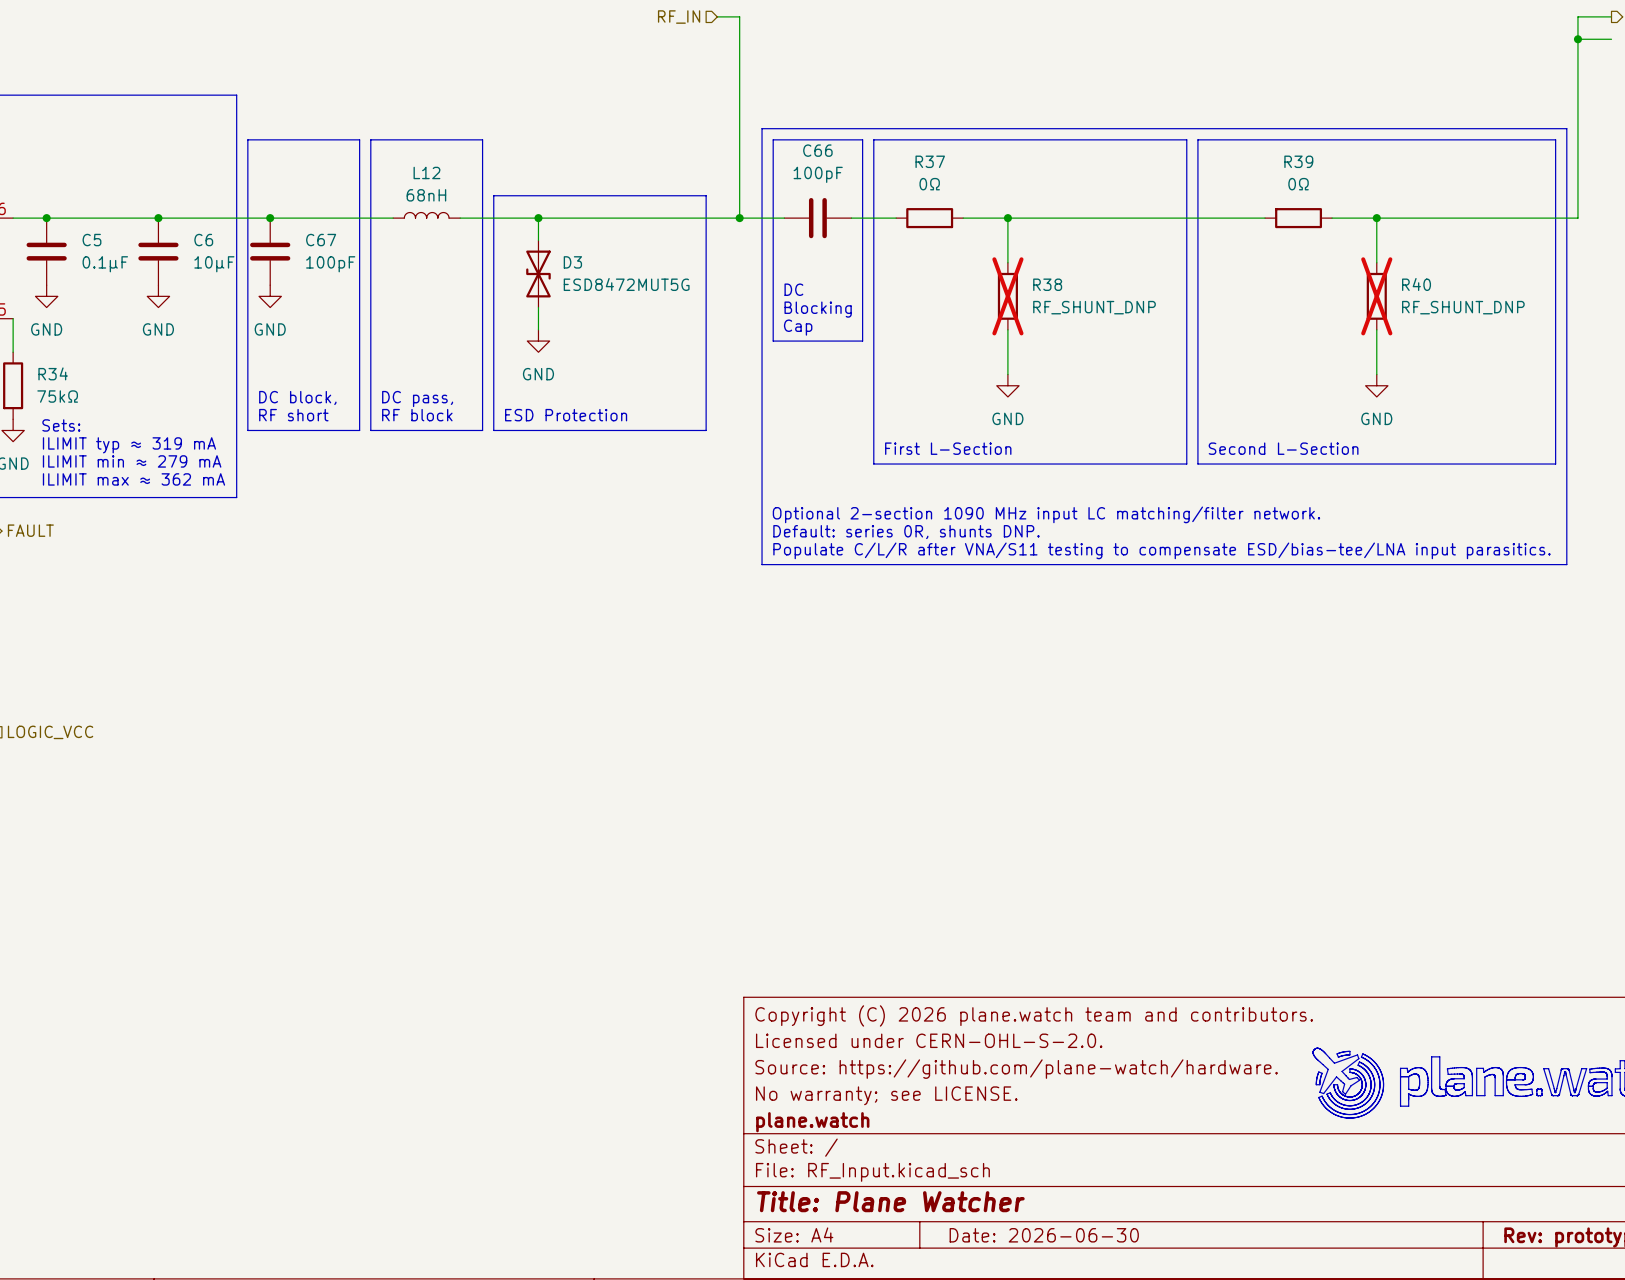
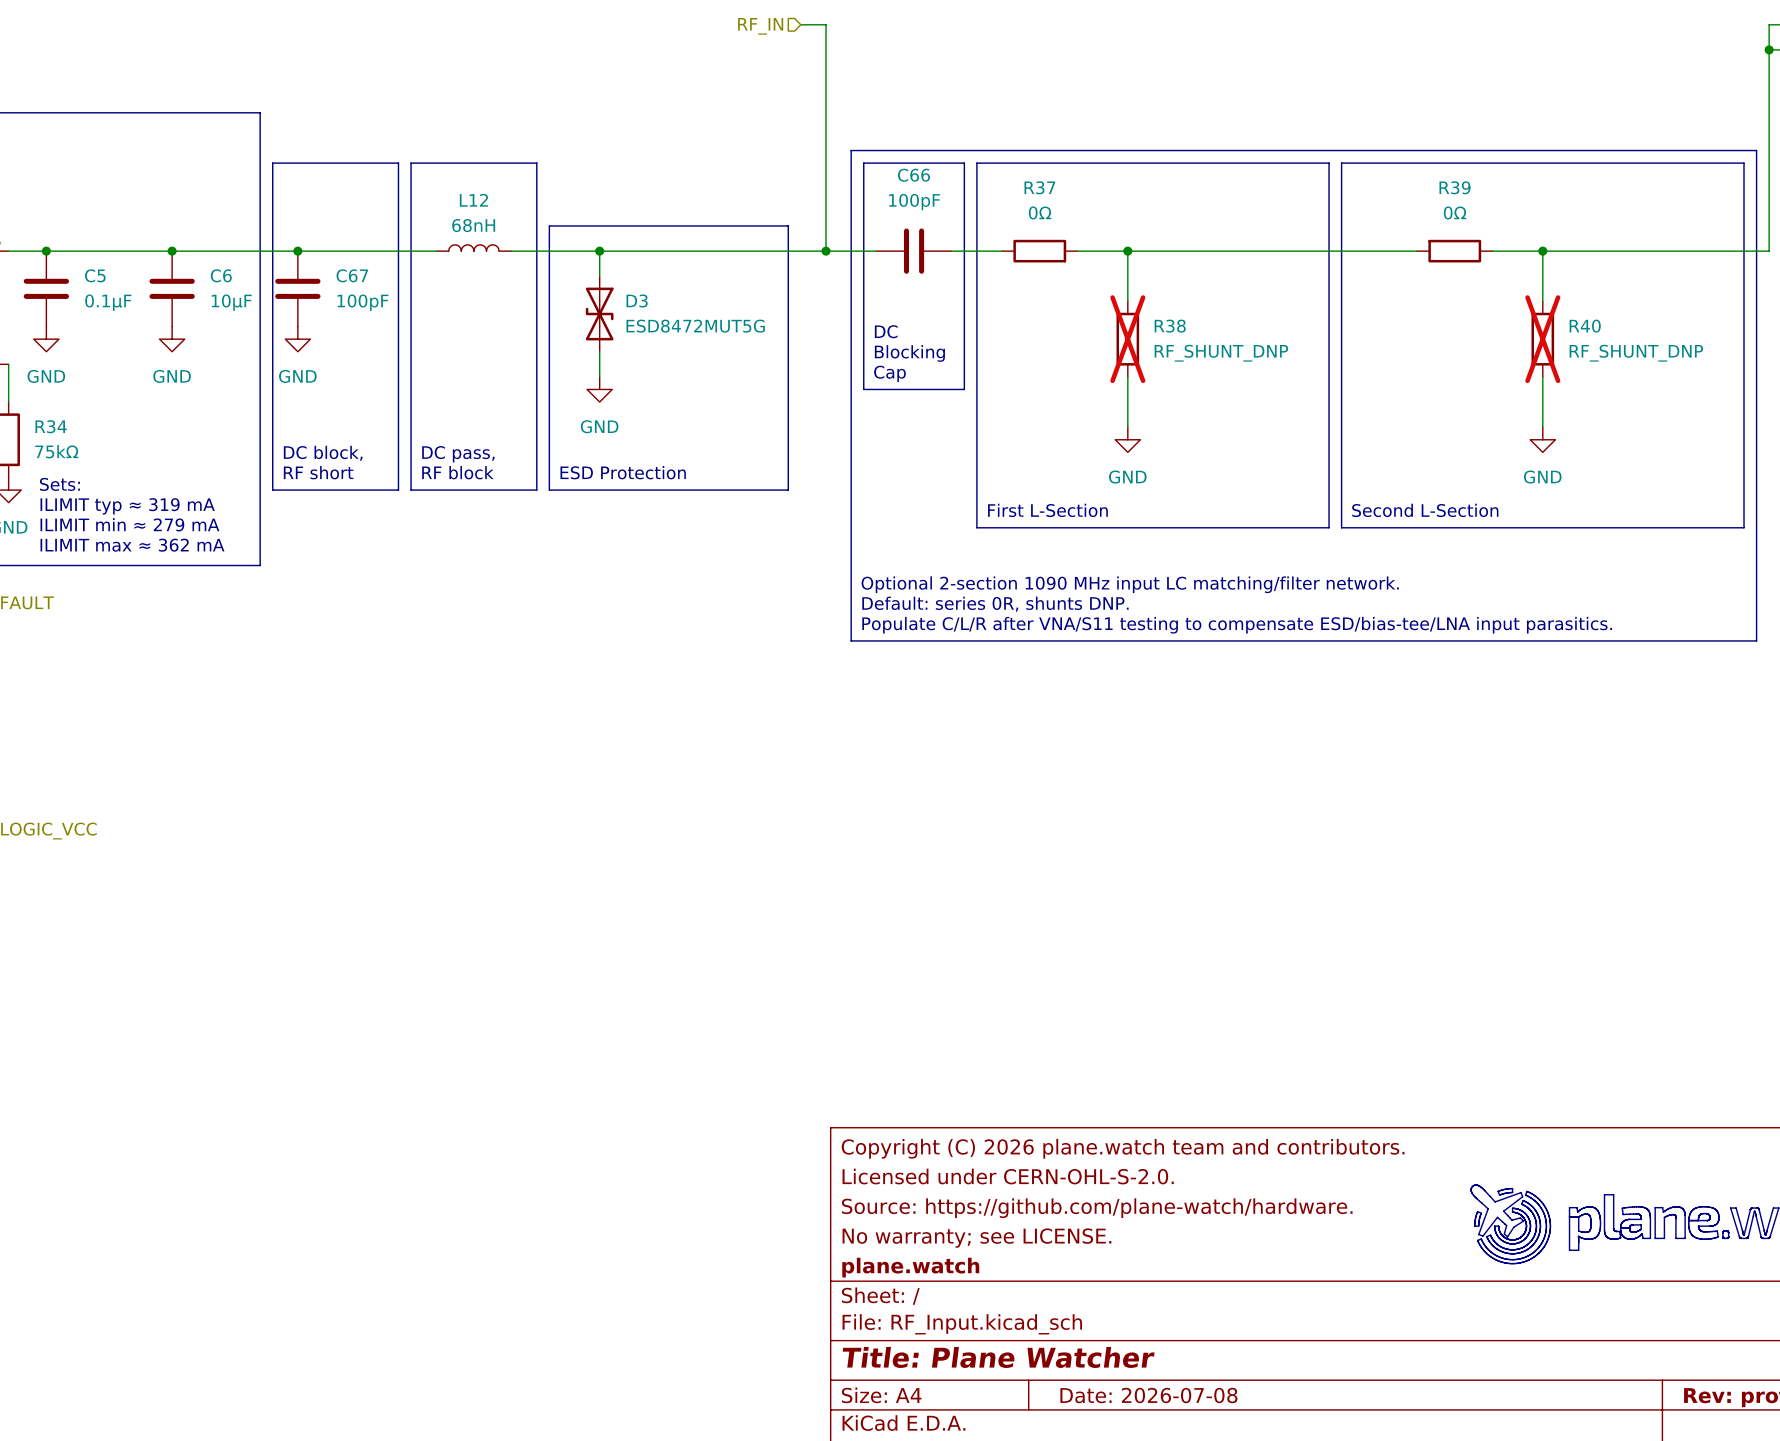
title block: Date: 2026-06-30 (1044, 1235) -> Date: 2026-07-08 (1148, 1395)

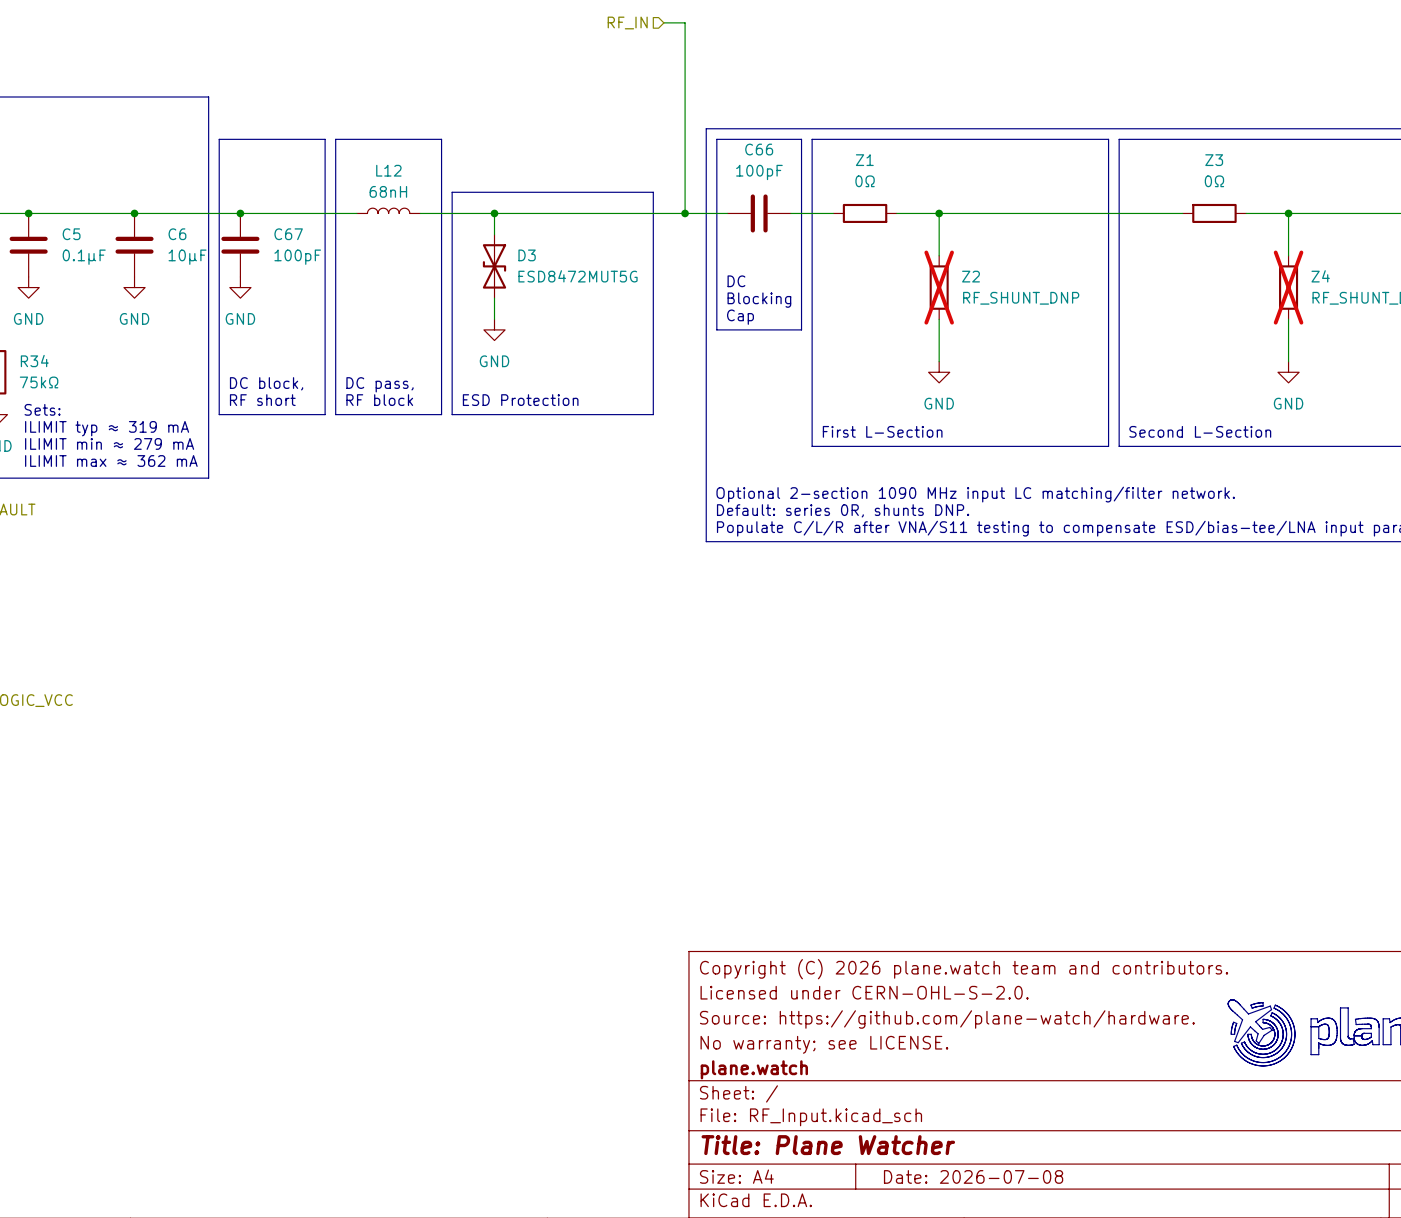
R37 name: R37 (1039, 187) -> Z1 (864, 160)
R39 name: R39 (1455, 187) -> Z3 (1214, 160)
R38 name: R38 (1170, 326) -> Z2 (971, 276)
R40 name: R40 (1585, 326) -> Z4 (1320, 276)

